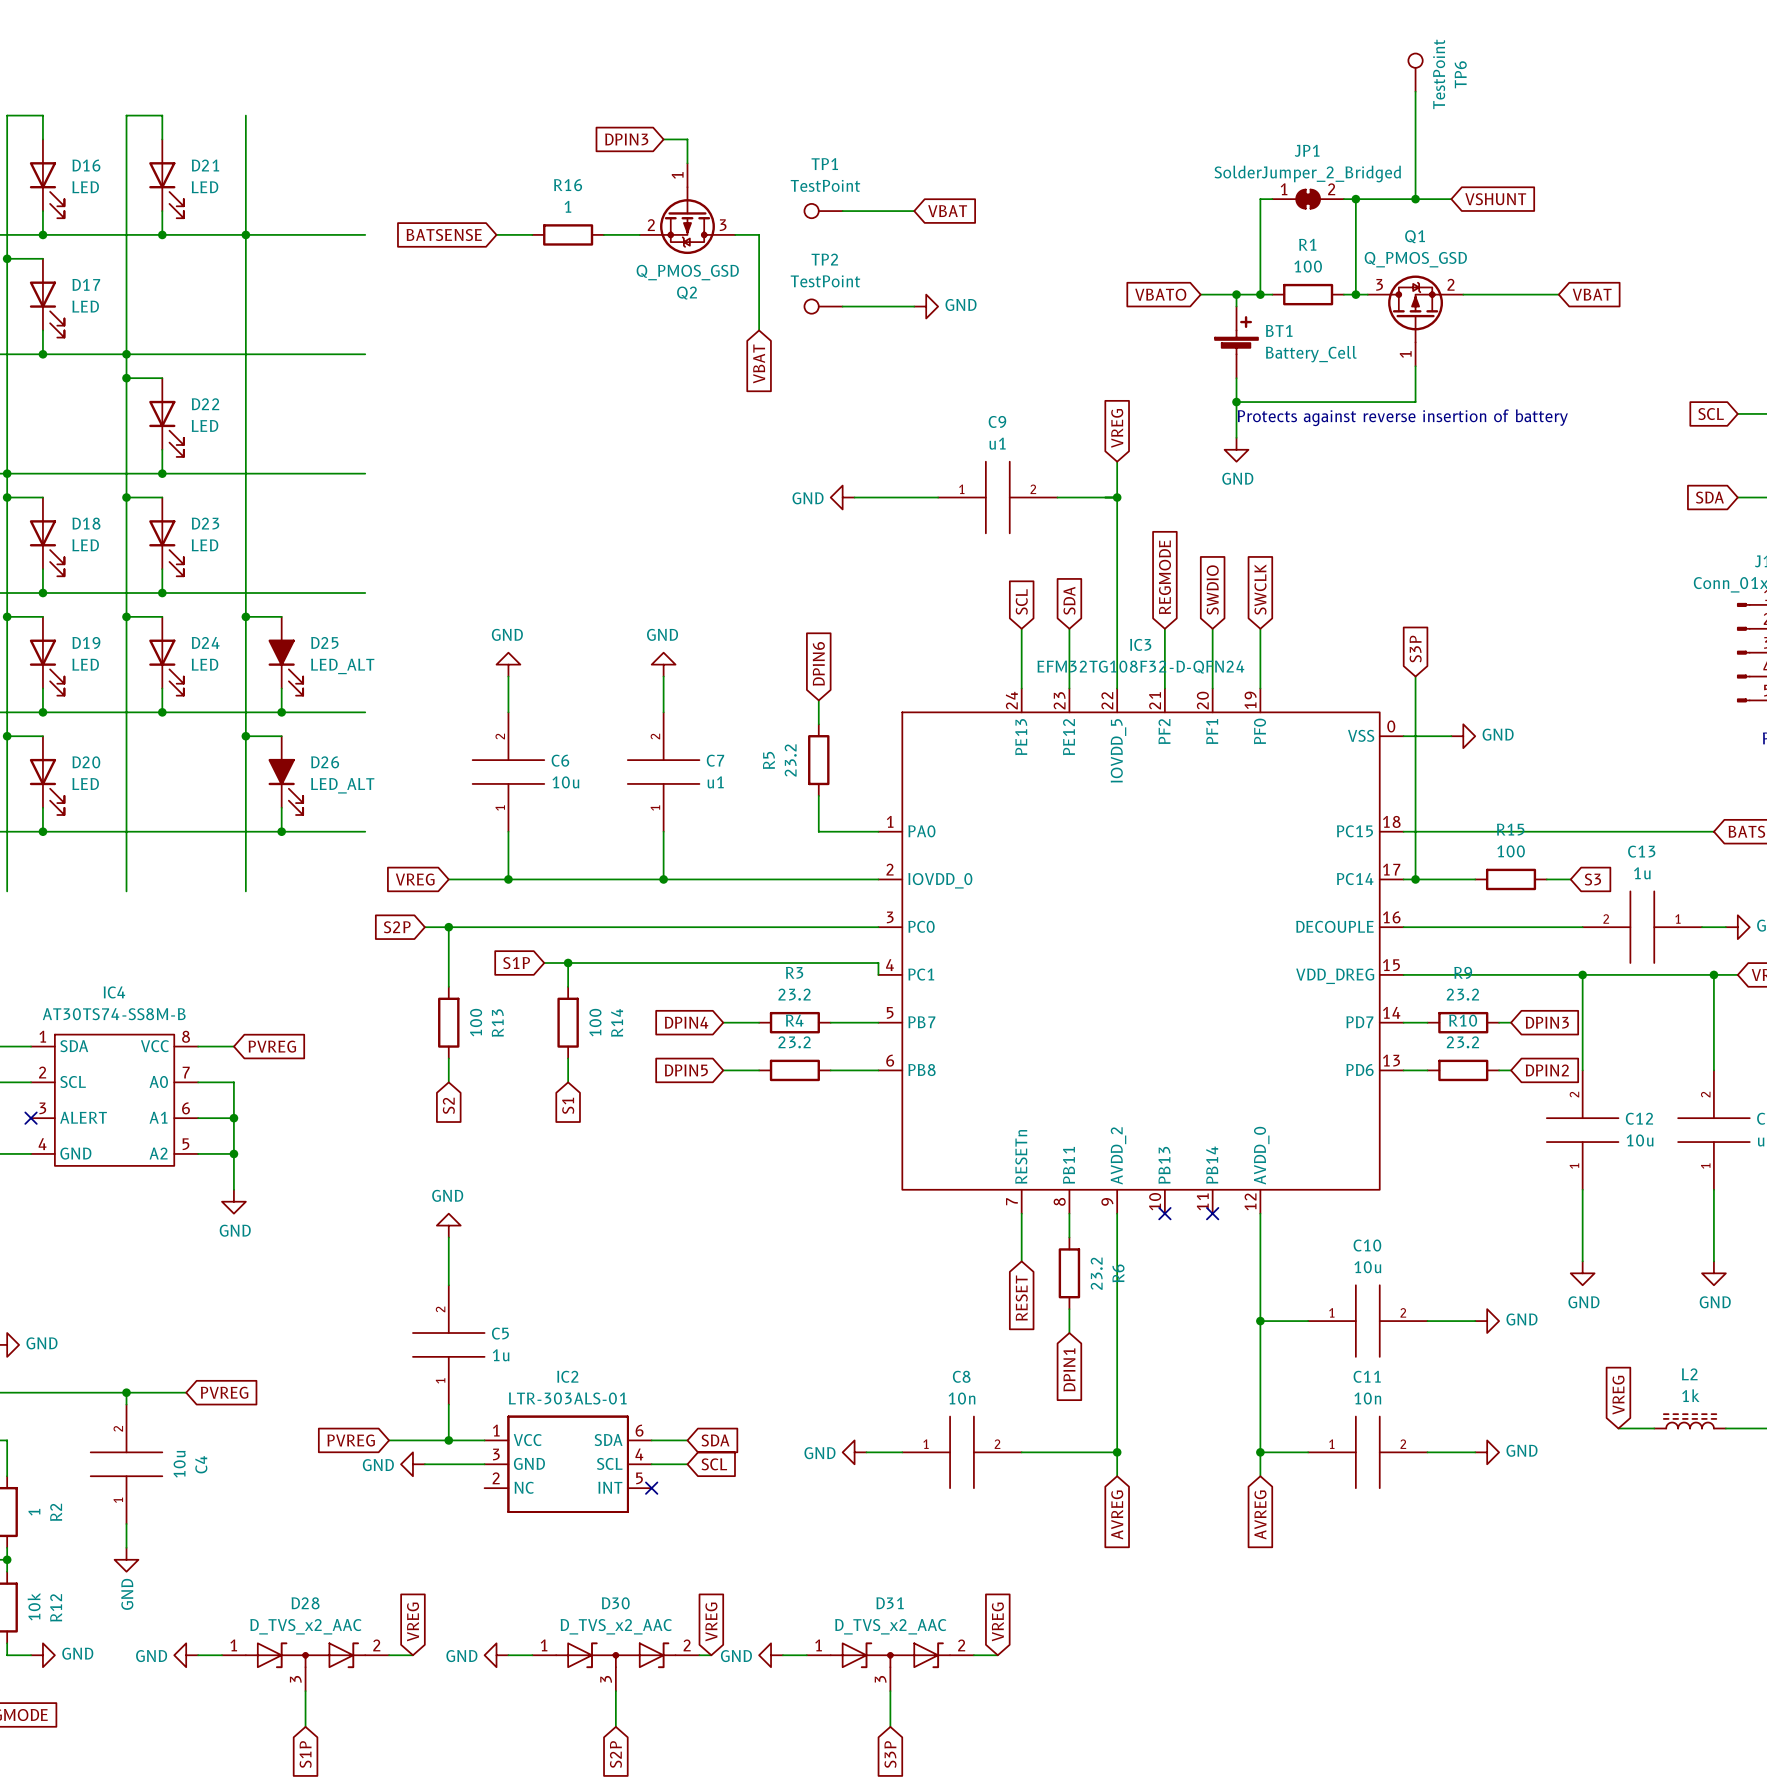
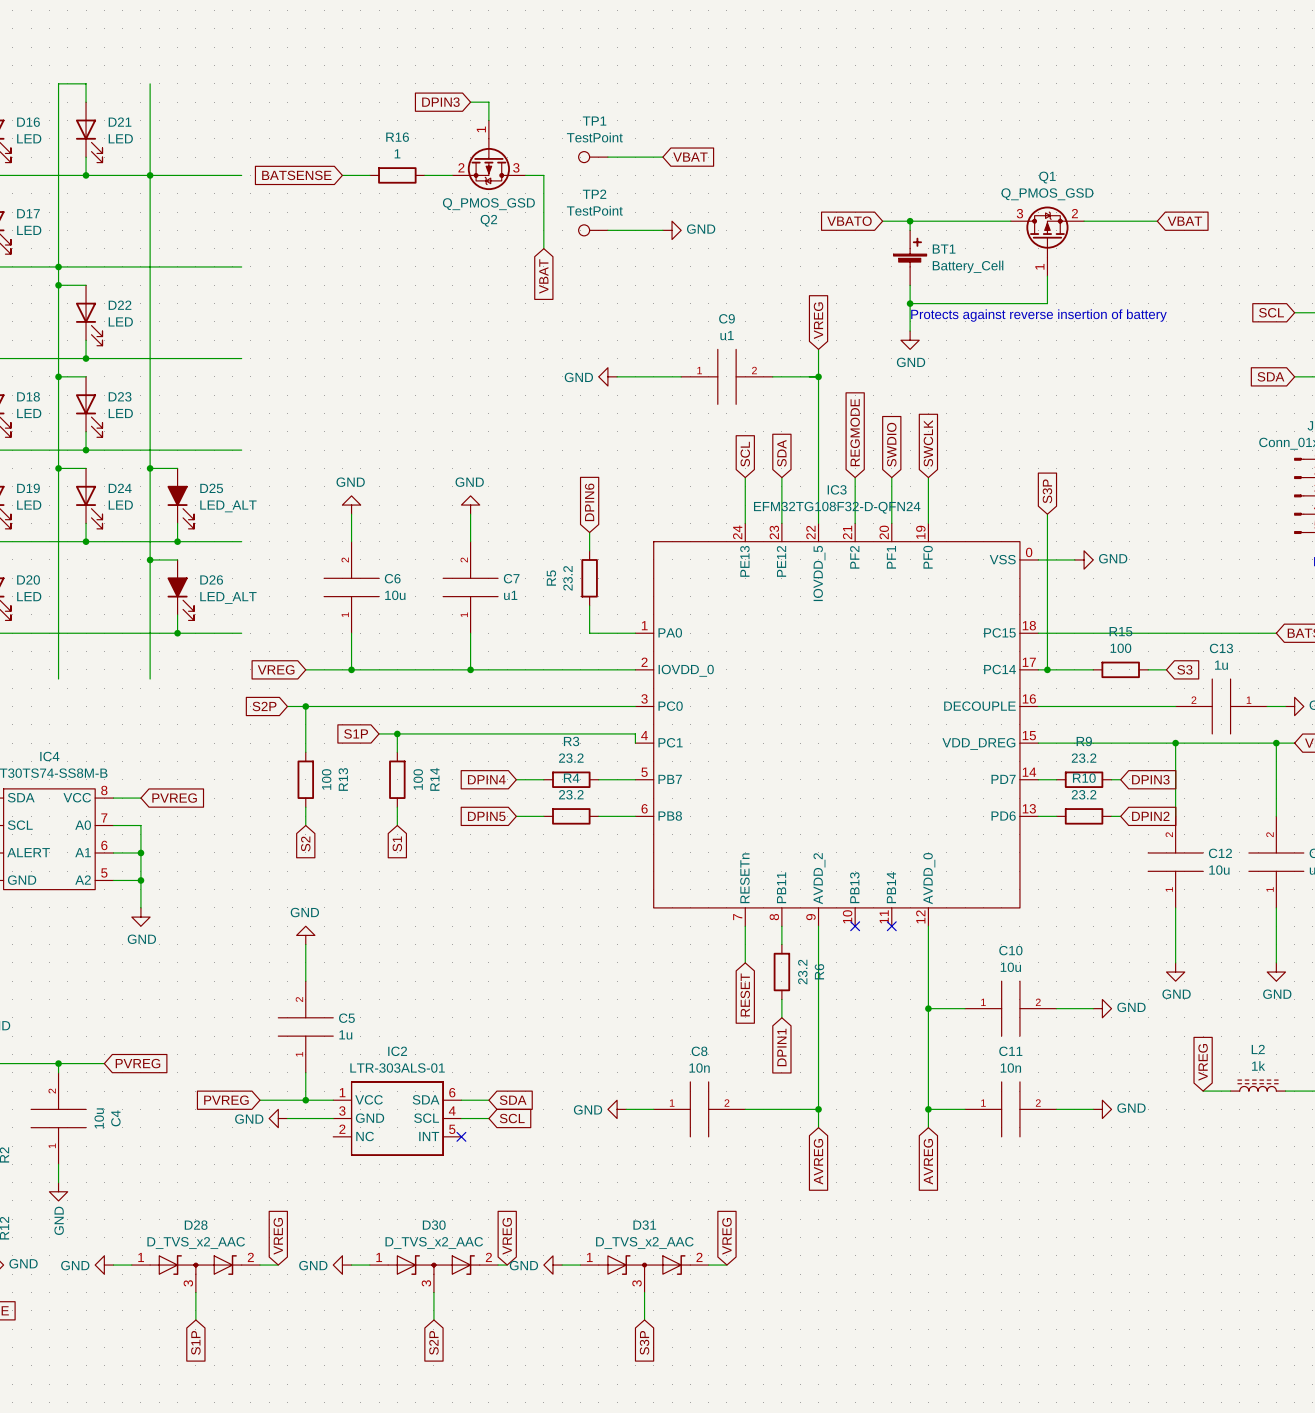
TP6: TestPoint (1415, 72) -> none
wire: (1415, 91) (1415, 199) -> none
wire: (1272, 199) (1260, 199) (1260, 294) -> none
JP1: SolderJumper_2_Bridged (1308, 199) -> none
wire: (1343, 199) (1451, 199) -> none
wire: (1355, 199) (1355, 294) -> none
junction: (1355, 199) -> none
junction: (1415, 199) -> none
global label: VSHUNT (1495, 199) -> none
junction: (1260, 294) -> none
wire: none -> (937, 221) (992, 221)
R1: 100 (1308, 294) -> none
junction: (1355, 294) -> none

